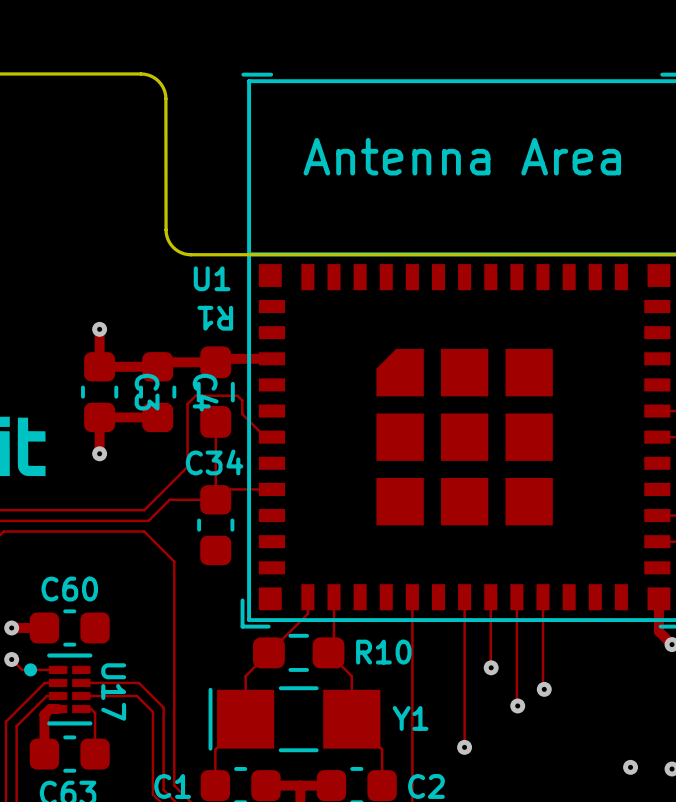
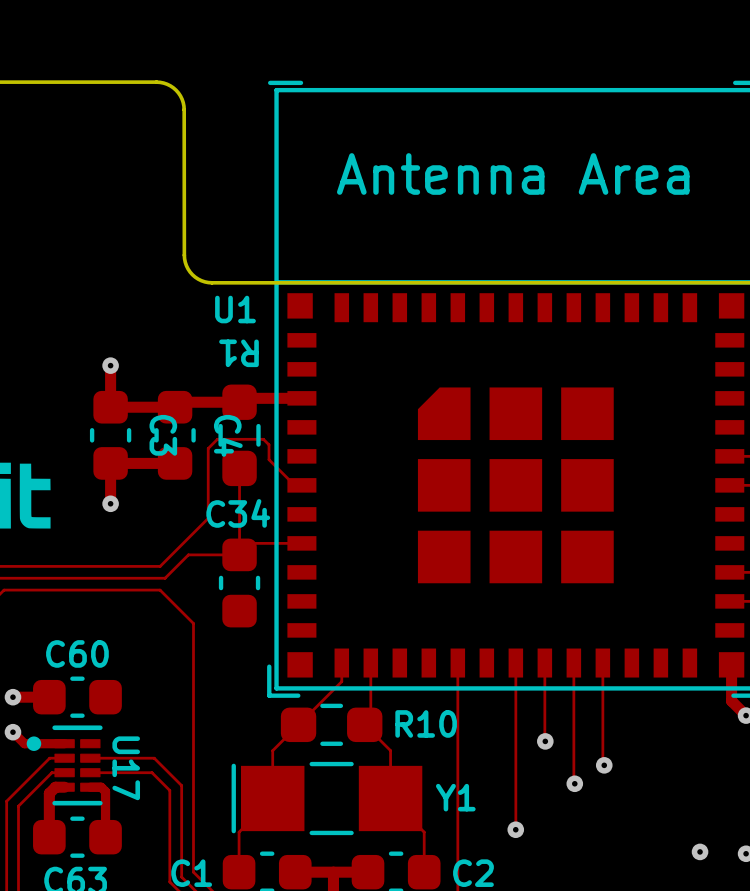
track width: thin (11, 659) (22, 669) (58, 669) -> thick (12, 732) (24, 743) (64, 743)
track width: thin (81, 709) (91, 709) (95, 713) (95, 754) -> thick (90, 787) (101, 787) (105, 791) (105, 837)

